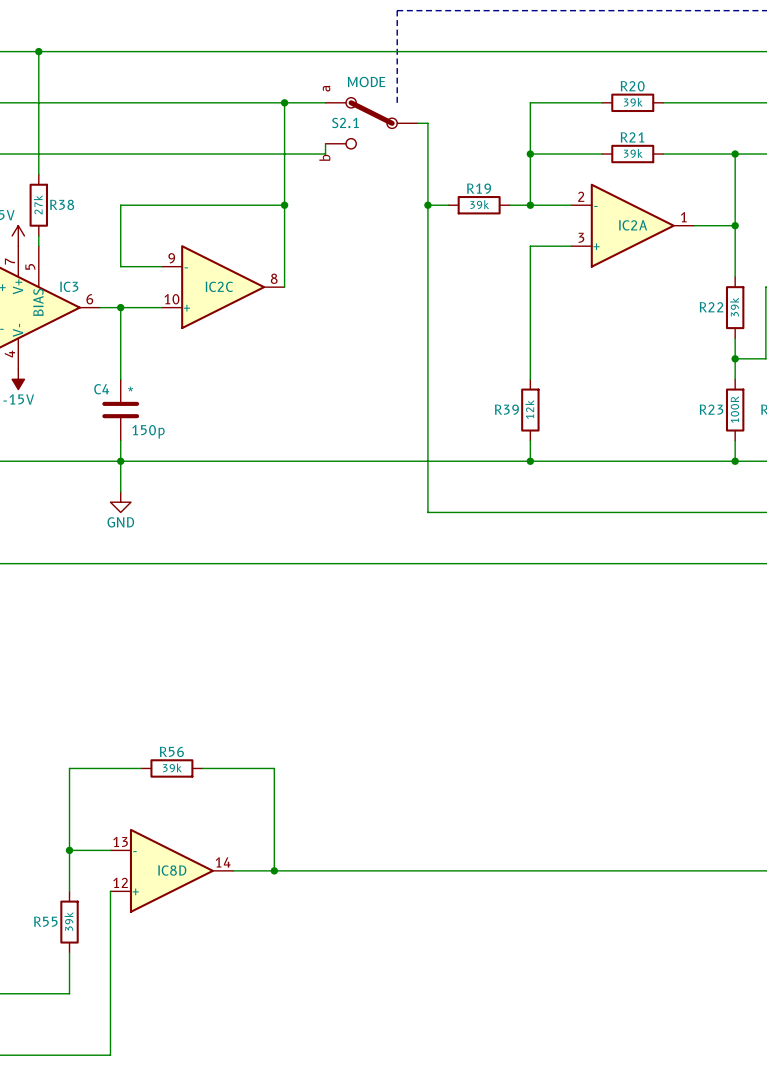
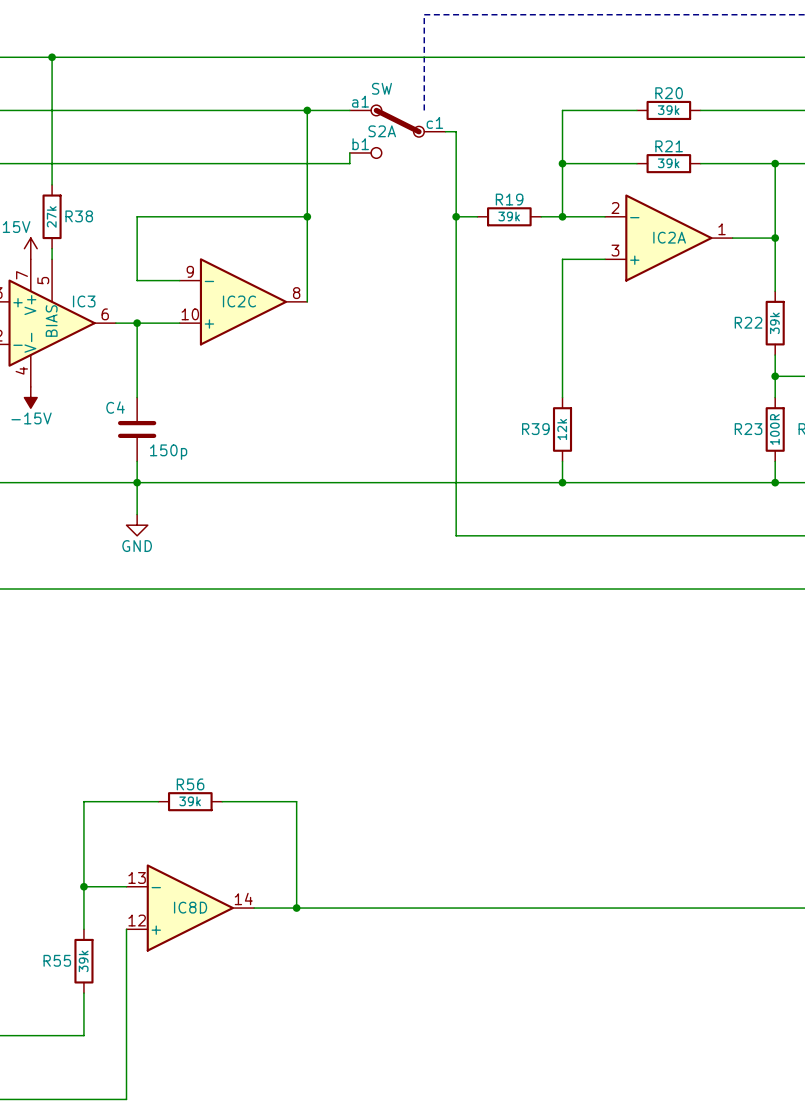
S2.1 value: MODE (366, 82) -> SW (381, 88)
S2.1 text: a (326, 88) -> none
S2.1 pin name: none -> a1 (360, 101)
S2.1 pin name: none -> c1 (434, 122)
S2.1 name: S2.1 (345, 122) -> S2A (382, 131)
S2.1 pin name: none -> b1 (360, 144)
S2.1 text: b (324, 157) -> none
C4 text: * (130, 389) -> none

